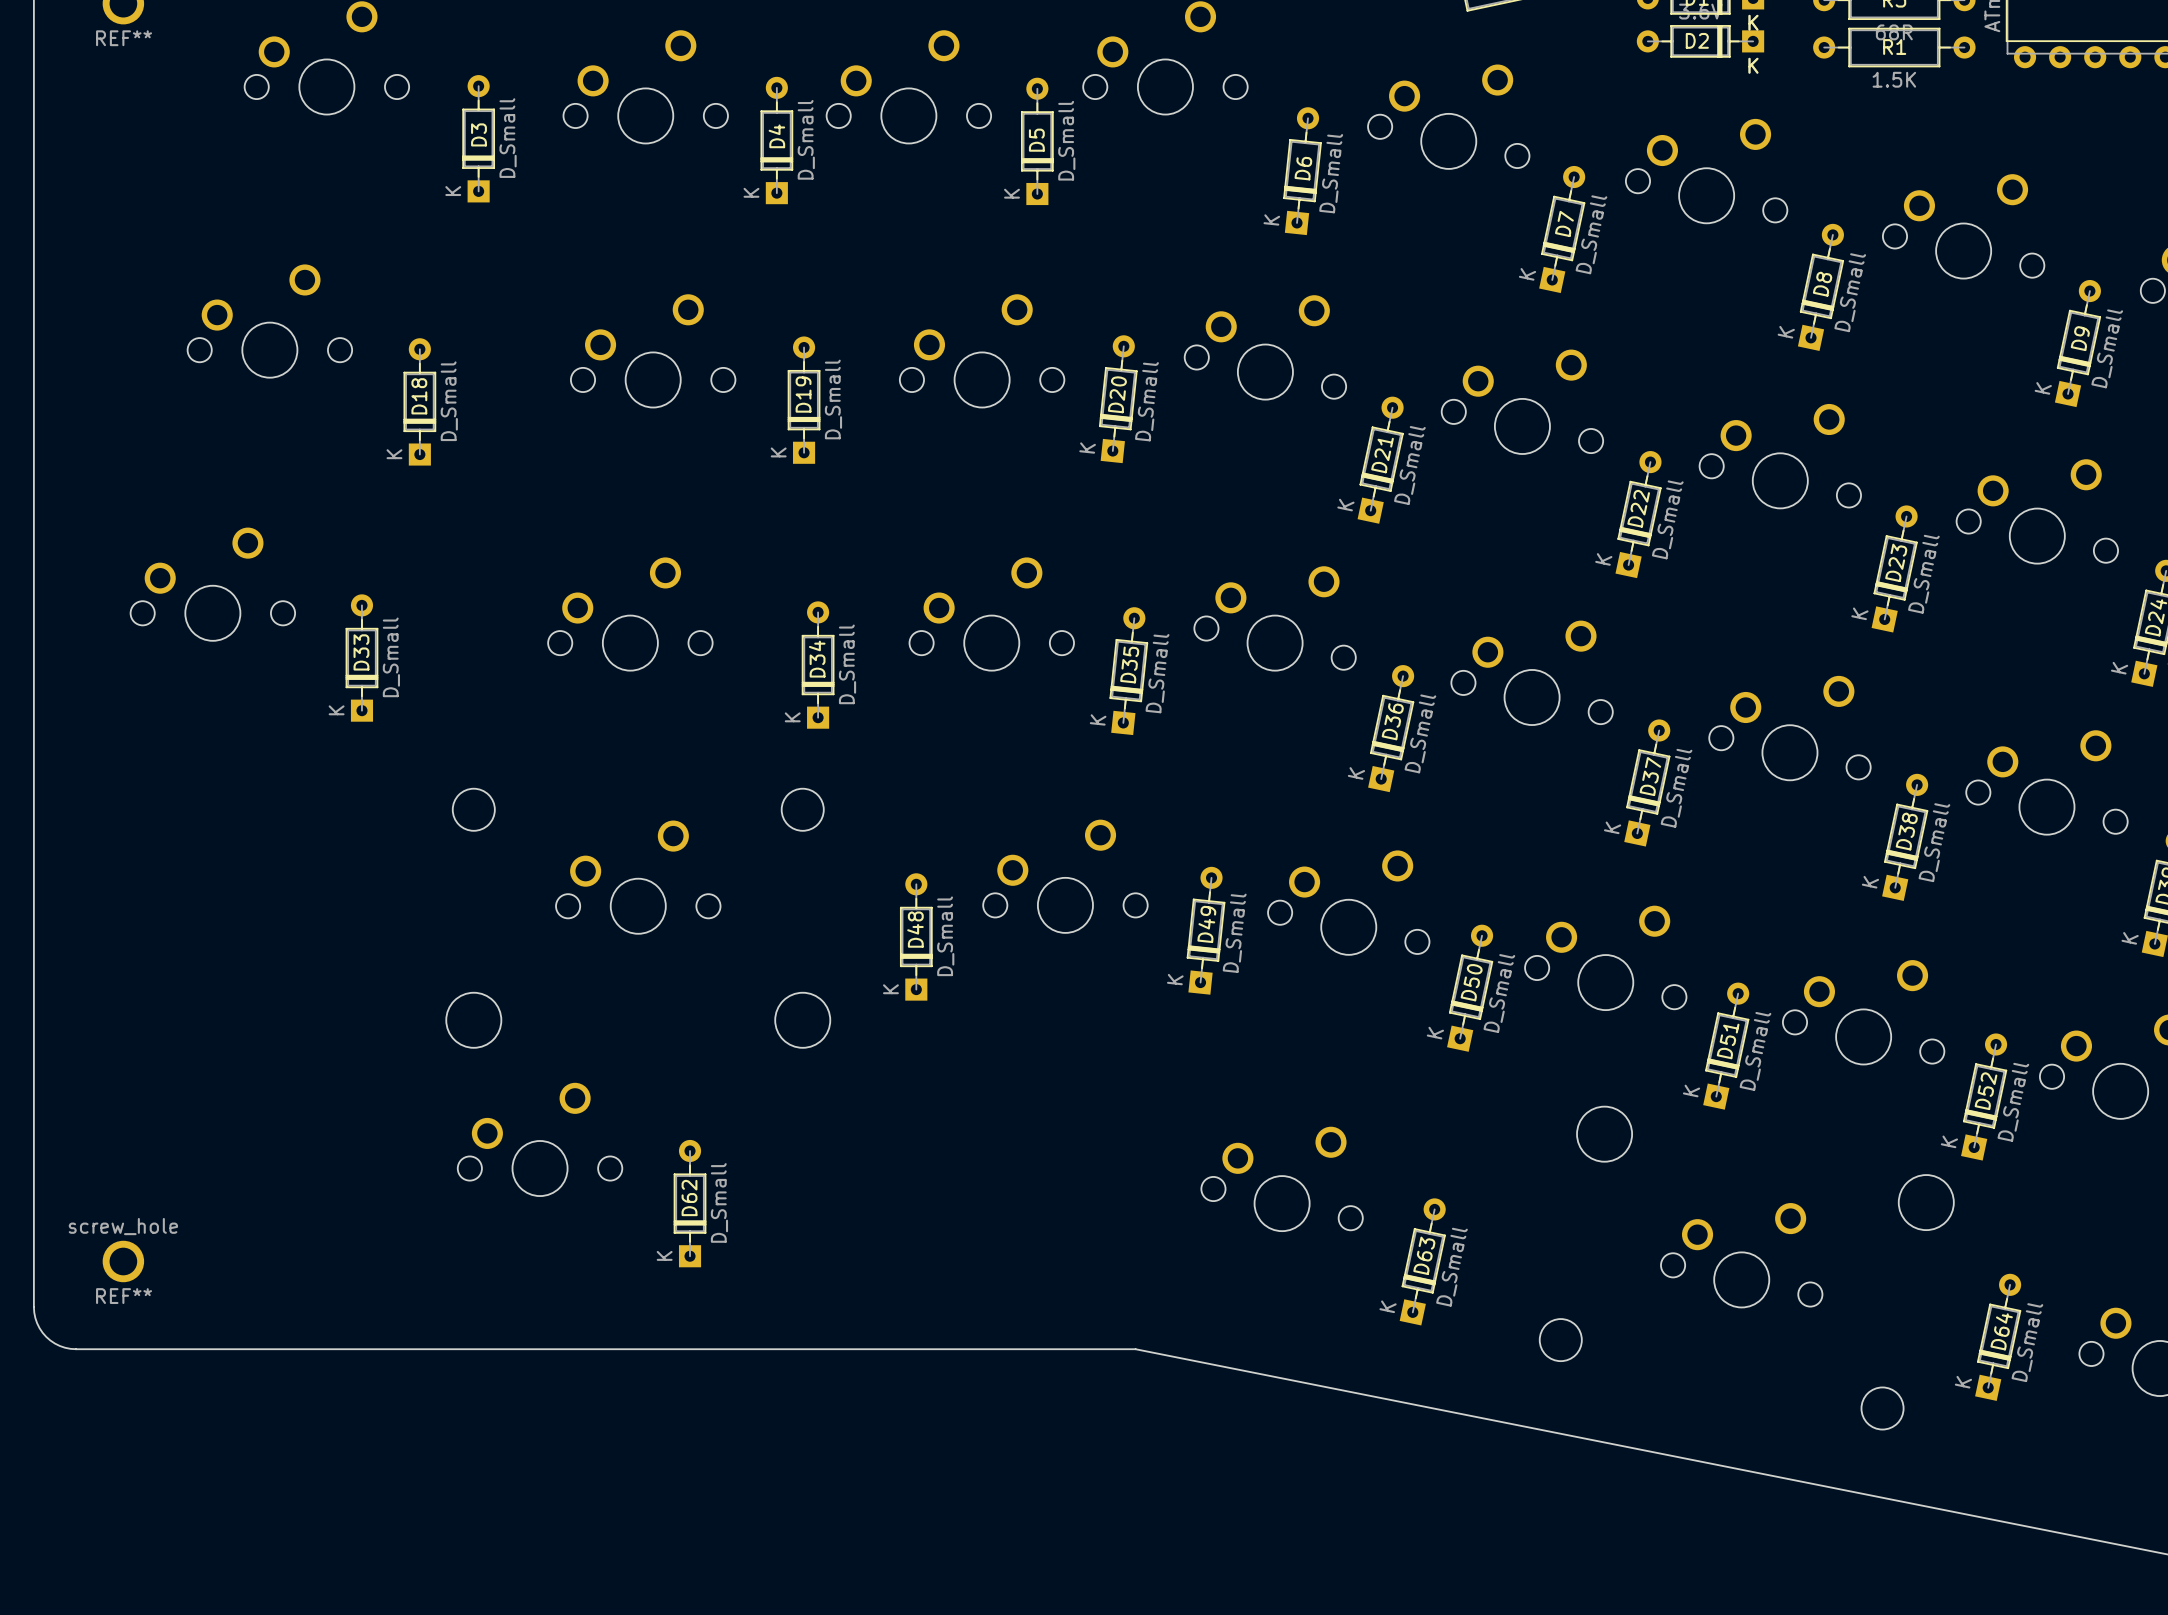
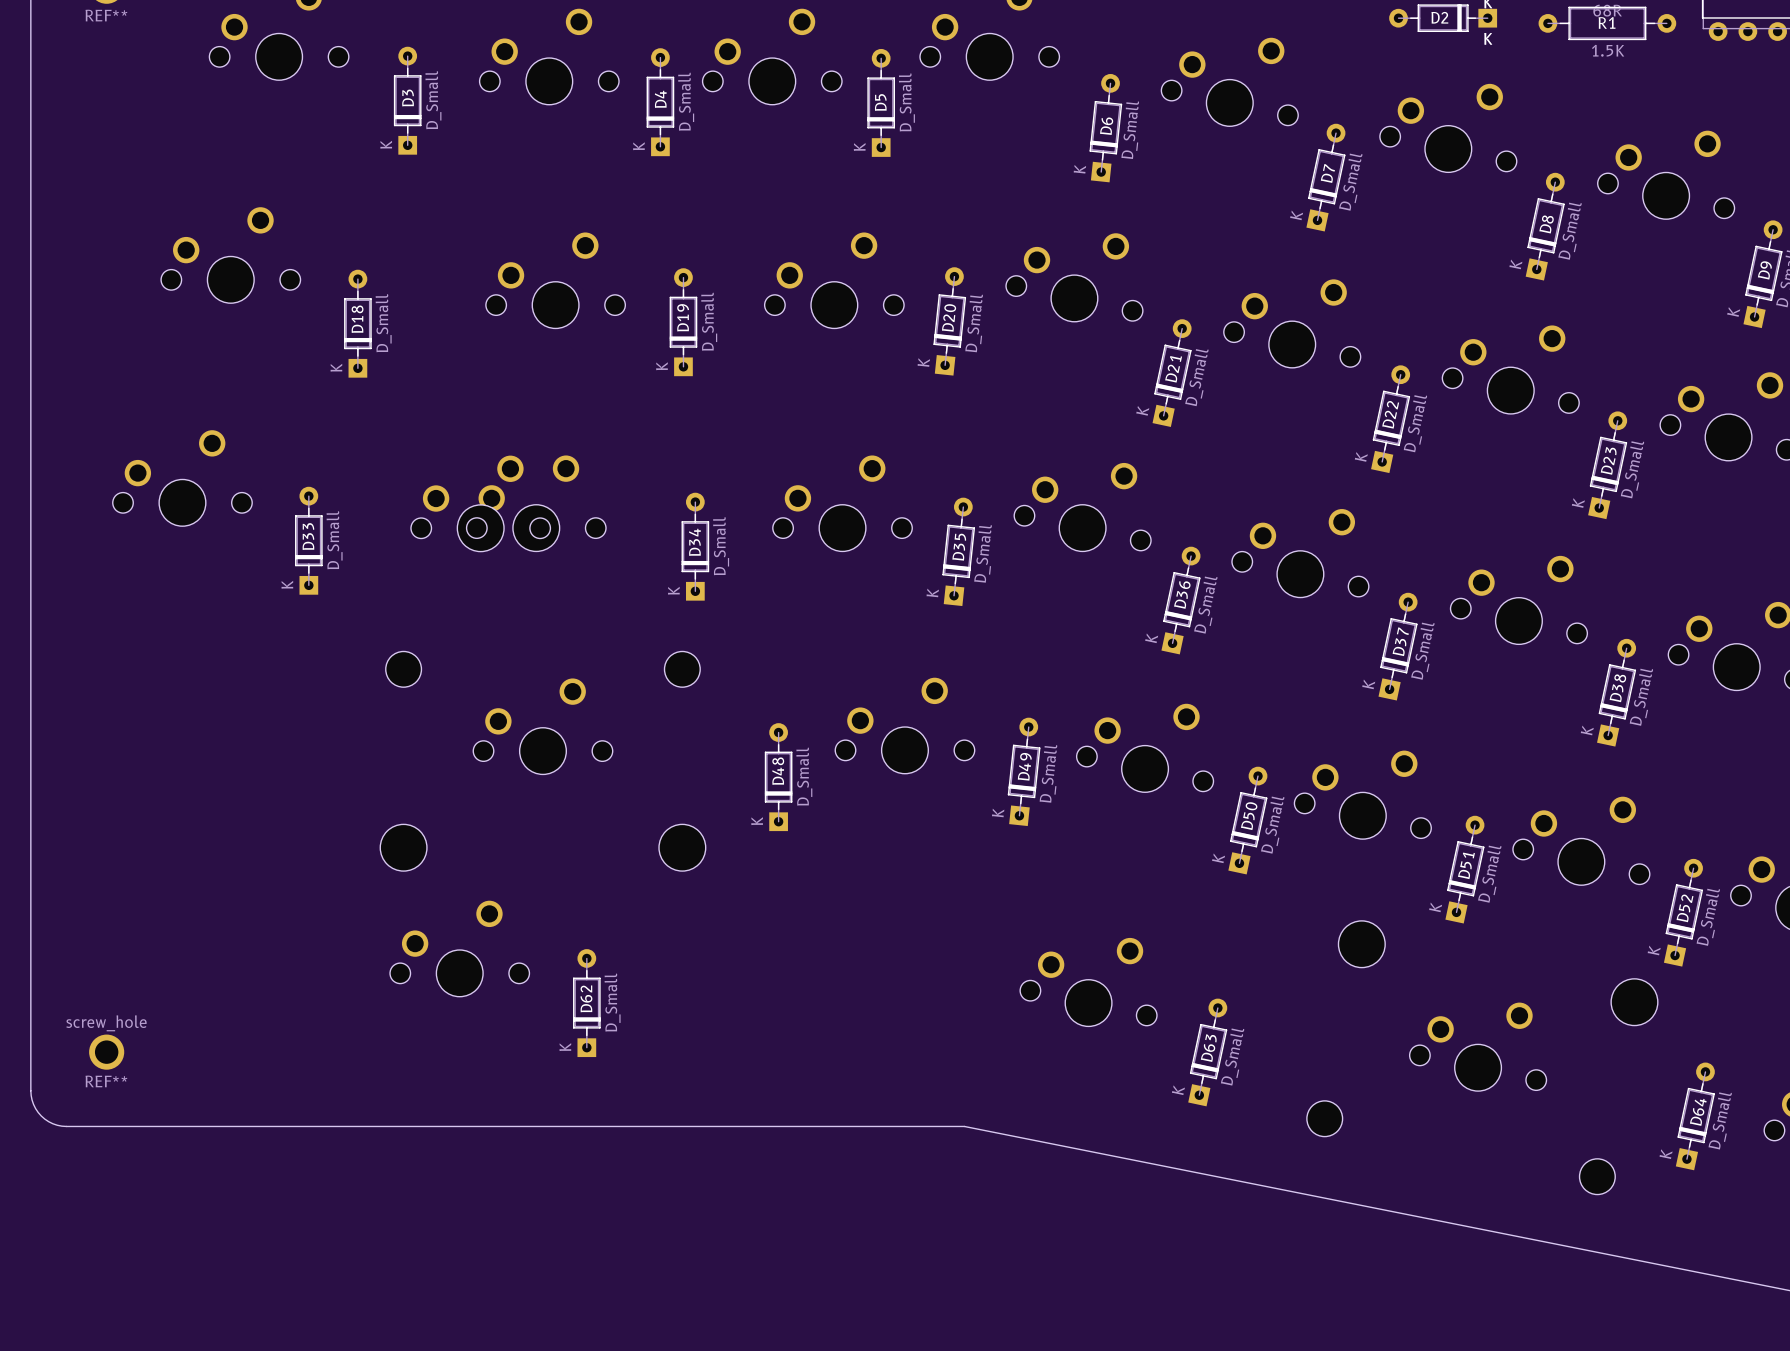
part: none -> (480, 503)

